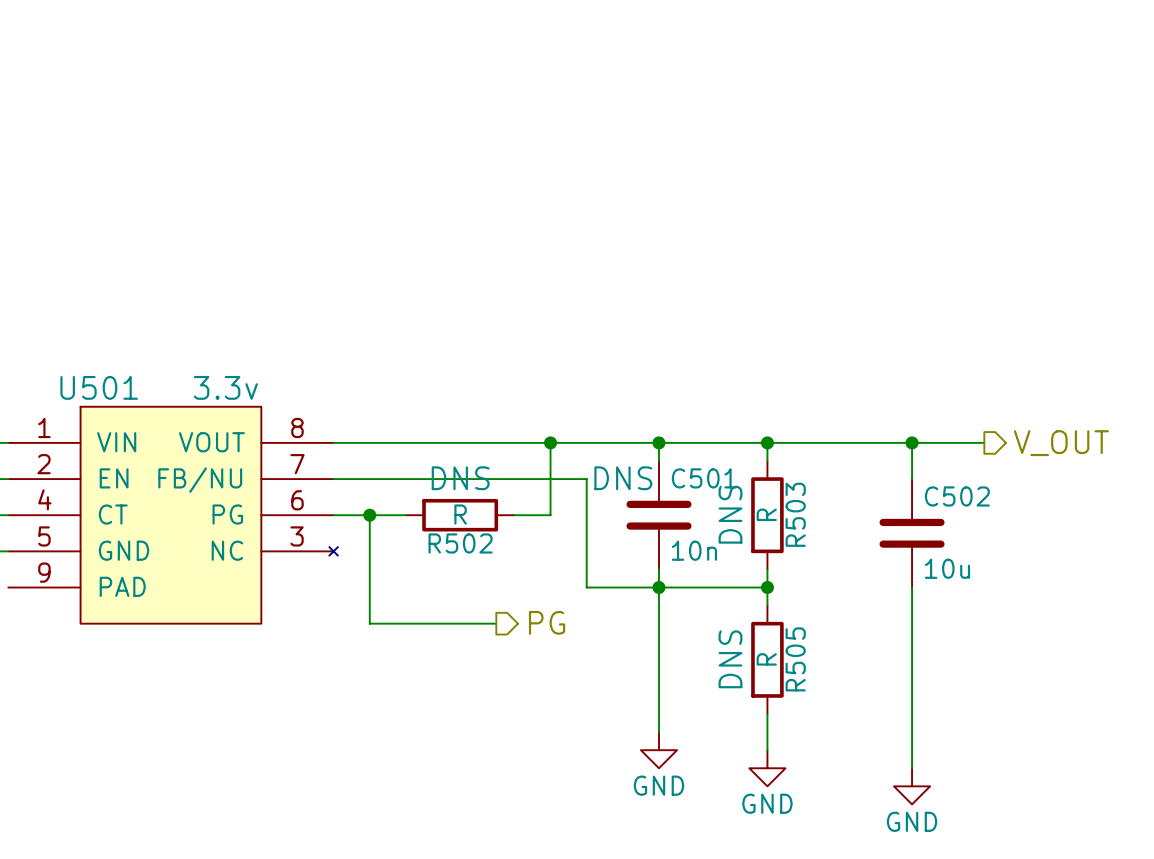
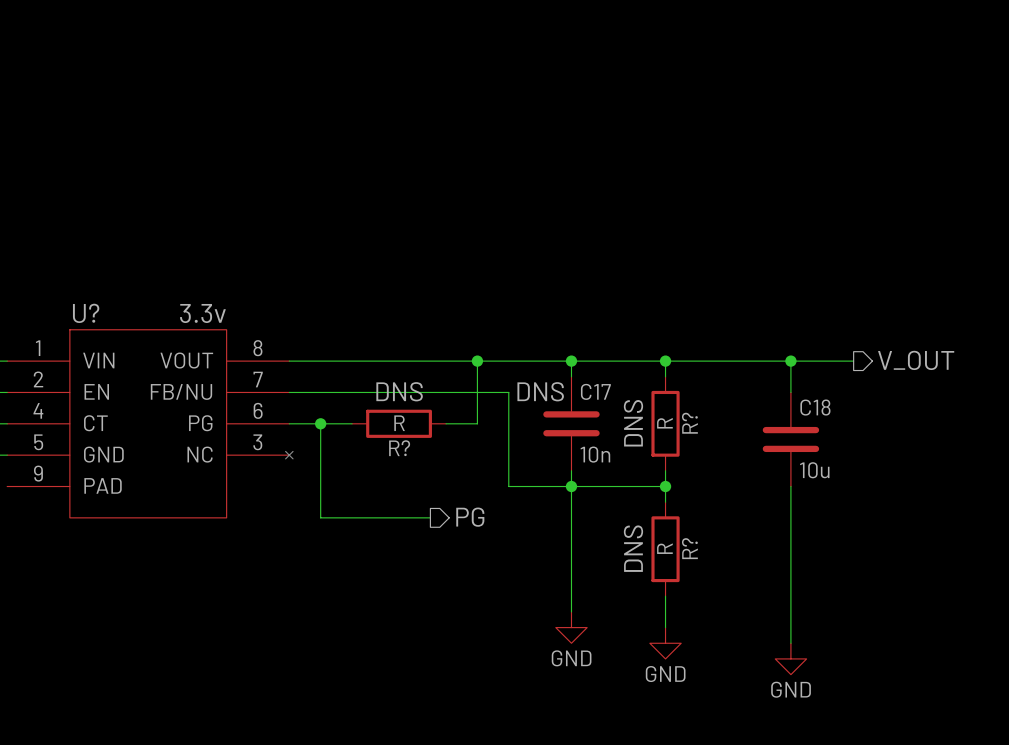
U501 name: U501 (99, 387) -> U? (86, 313)
C501 name: C501 (704, 478) -> C17 (595, 391)
C502 name: C502 (957, 496) -> C18 (815, 407)
R503 name: R503 (795, 514) -> R? (689, 423)
R502 name: R502 (460, 543) -> R? (399, 448)
R505 name: R505 (795, 659) -> R? (689, 548)

